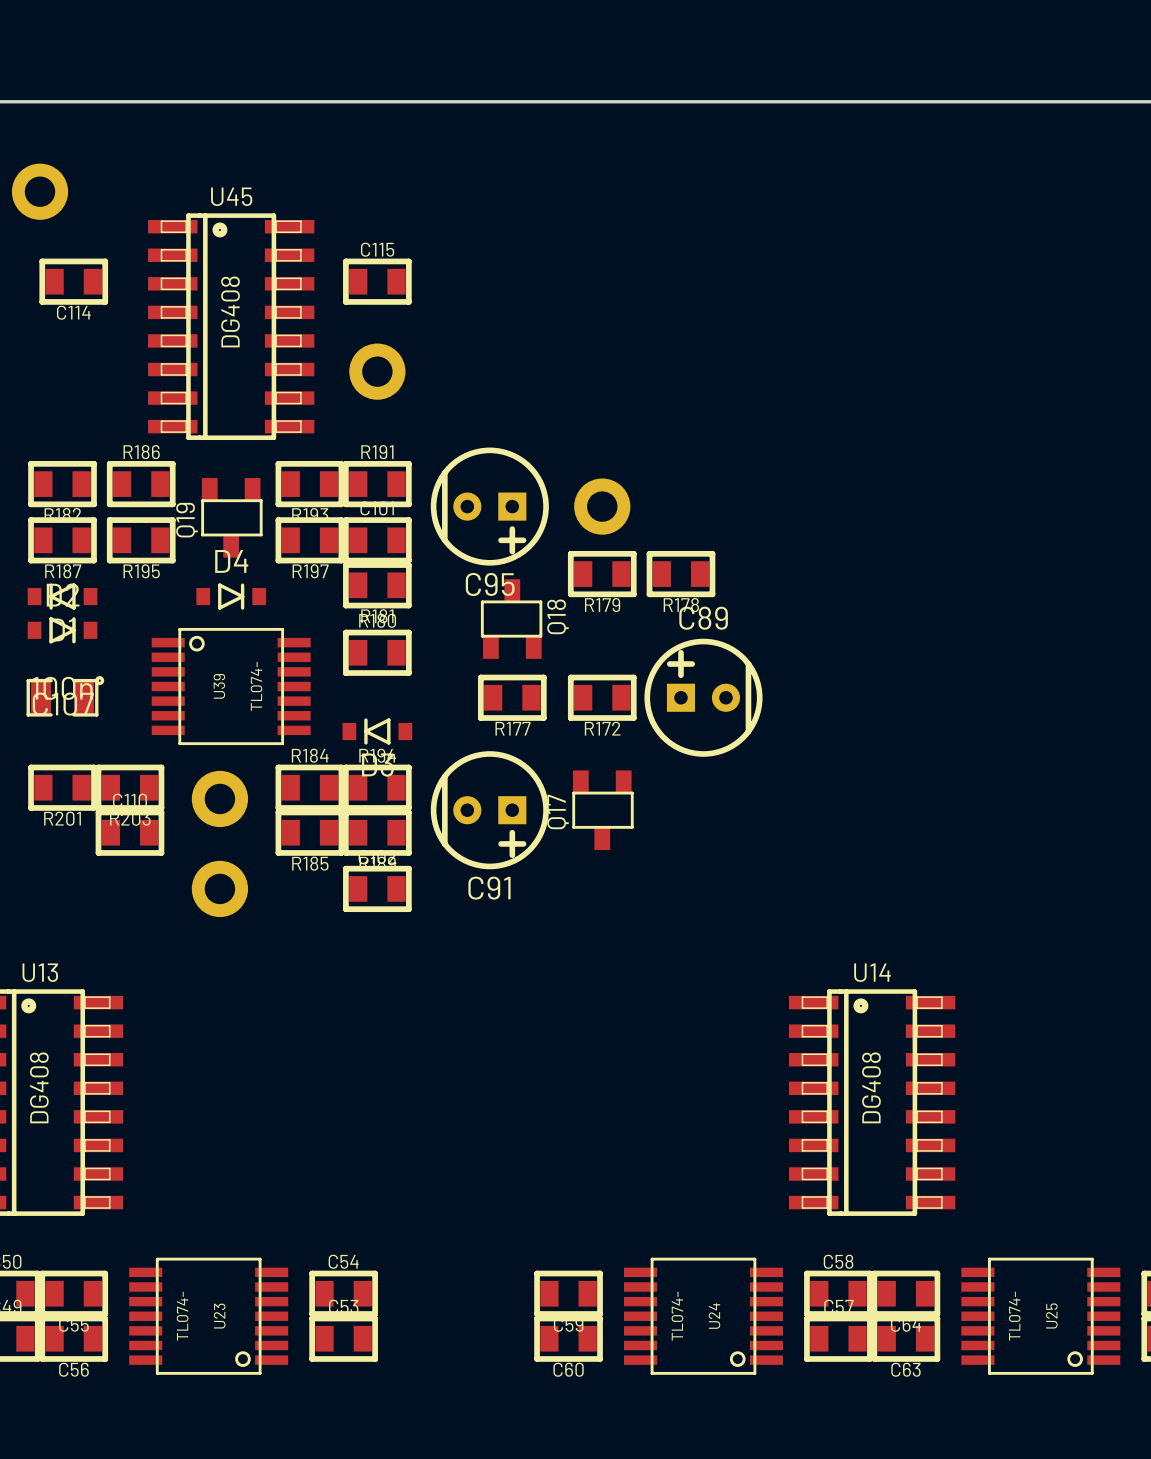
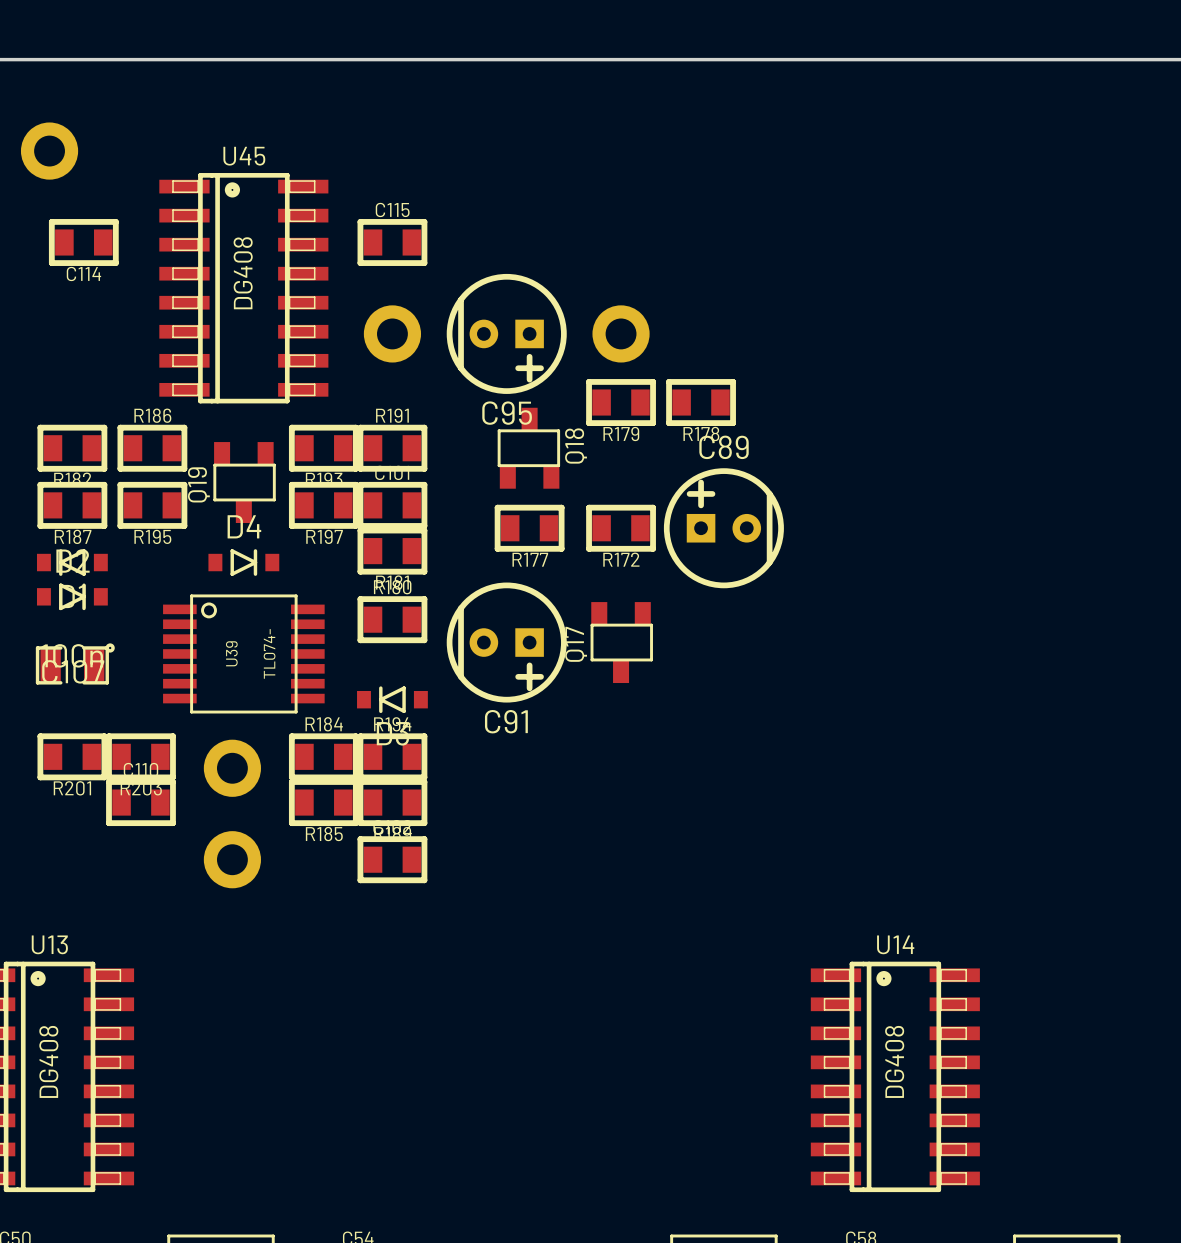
C95 position: (489, 506) -> (506, 333)
part position: (602, 506) -> (621, 333)
R179 position: (602, 574) -> (621, 402)
R178 position: (680, 574) -> (701, 402)
Q18 position: (511, 619) -> (528, 448)
R177 position: (512, 697) -> (529, 528)
R172 position: (602, 697) -> (621, 528)
C89 position: (703, 697) -> (723, 528)
C91 position: (489, 810) -> (506, 642)
Q17 position: (602, 810) -> (621, 642)

